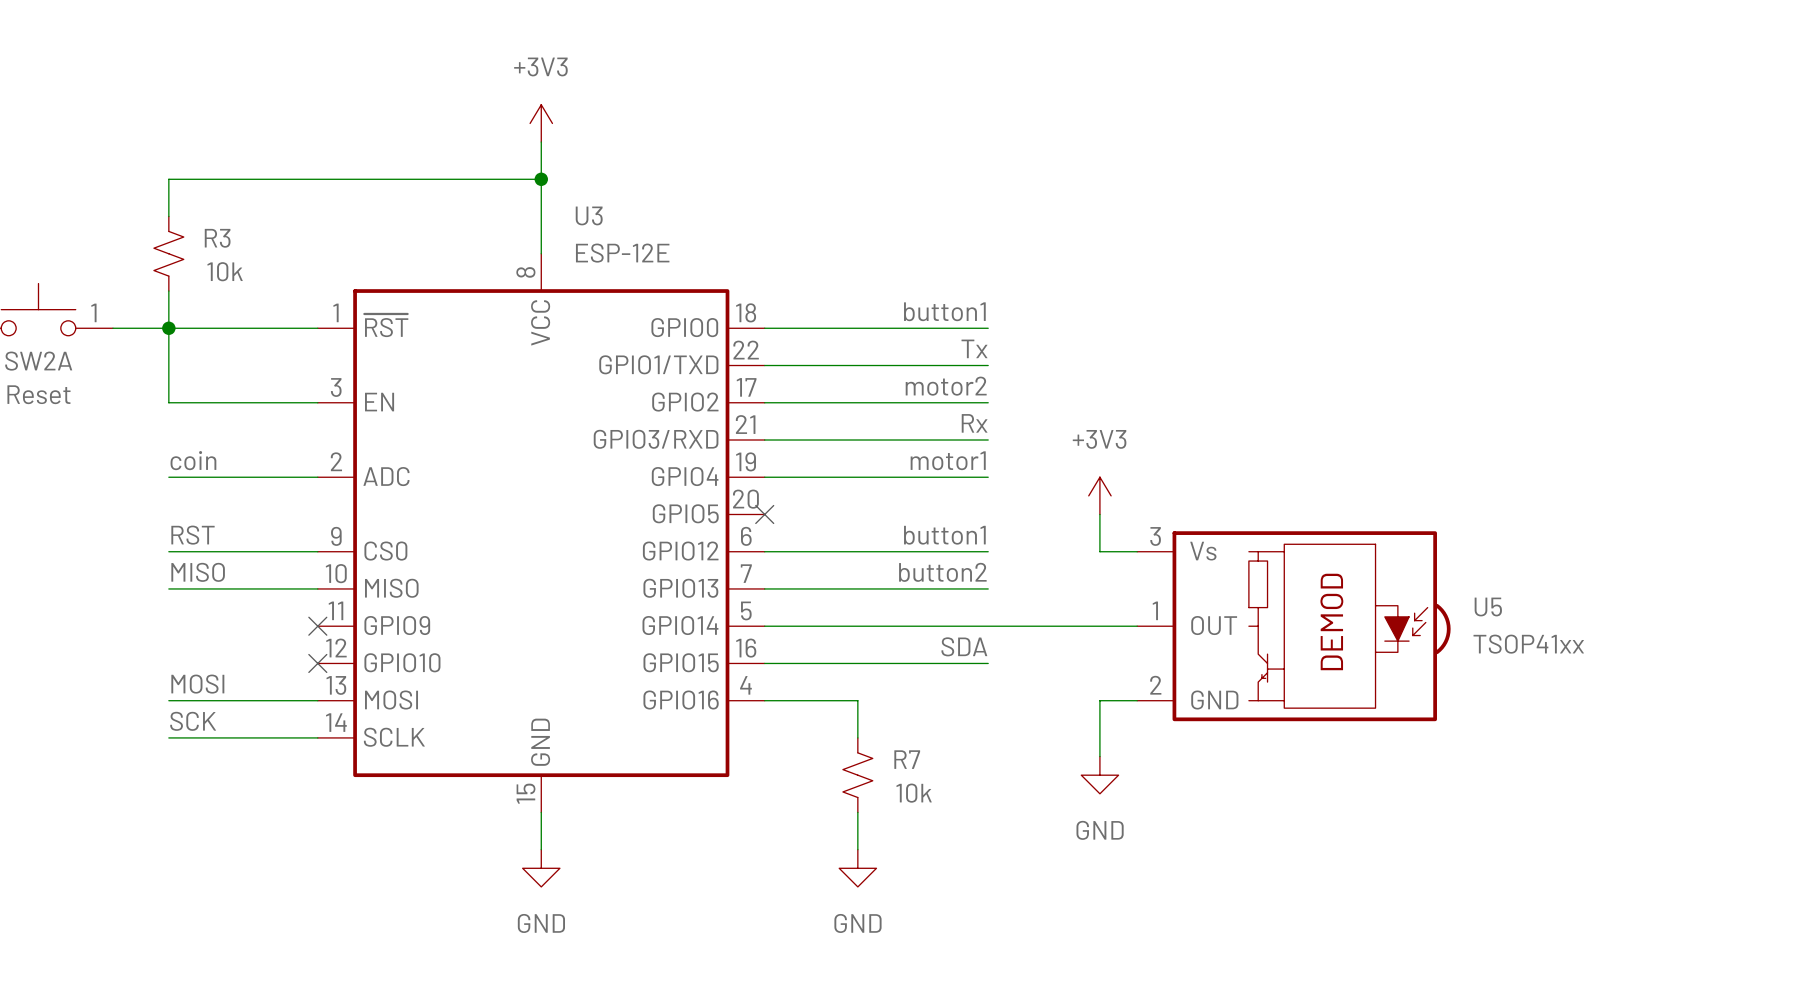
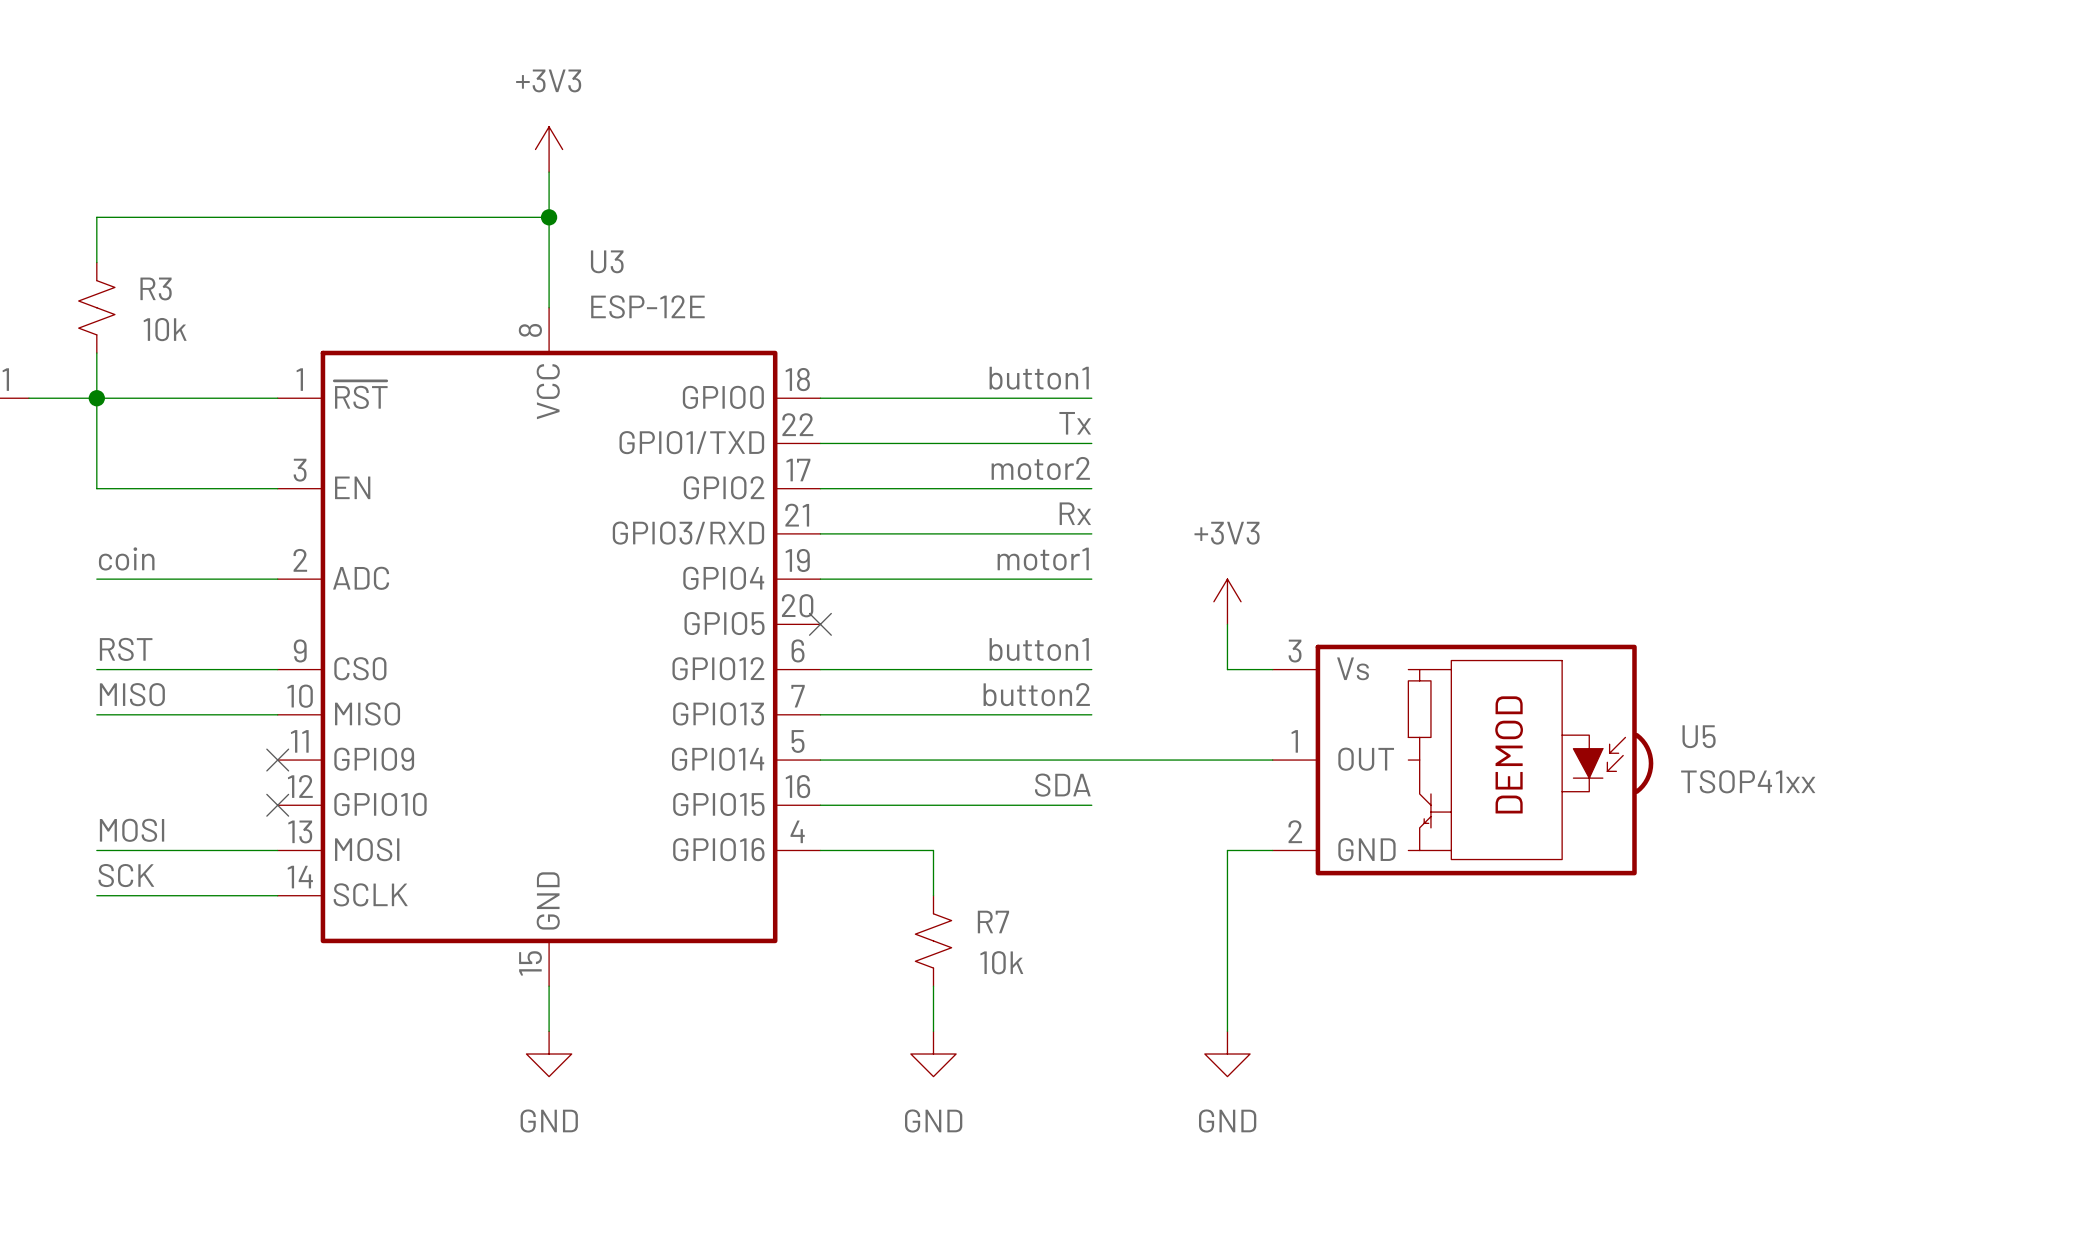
wire: none -> (1227, 918) (1227, 1031)
power symbol position: GND (1099, 775) -> GND (1227, 1054)

